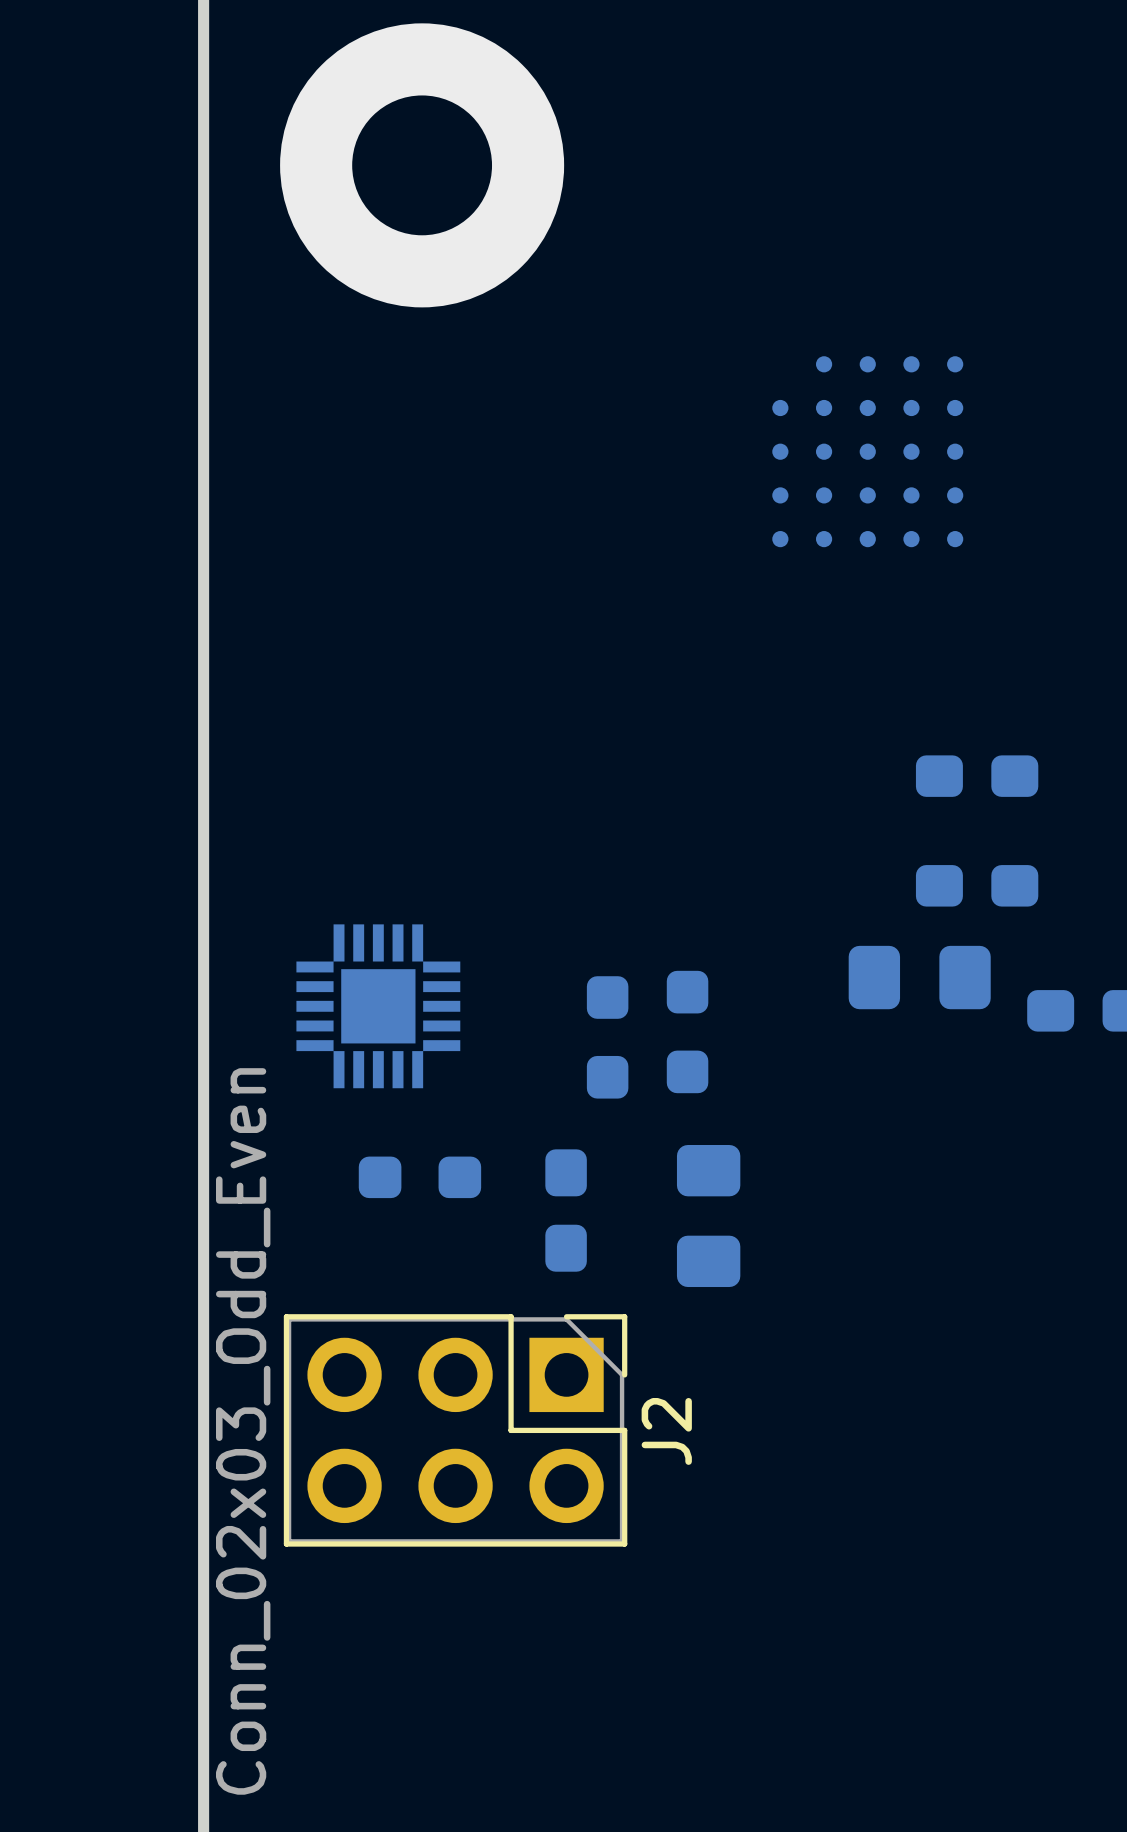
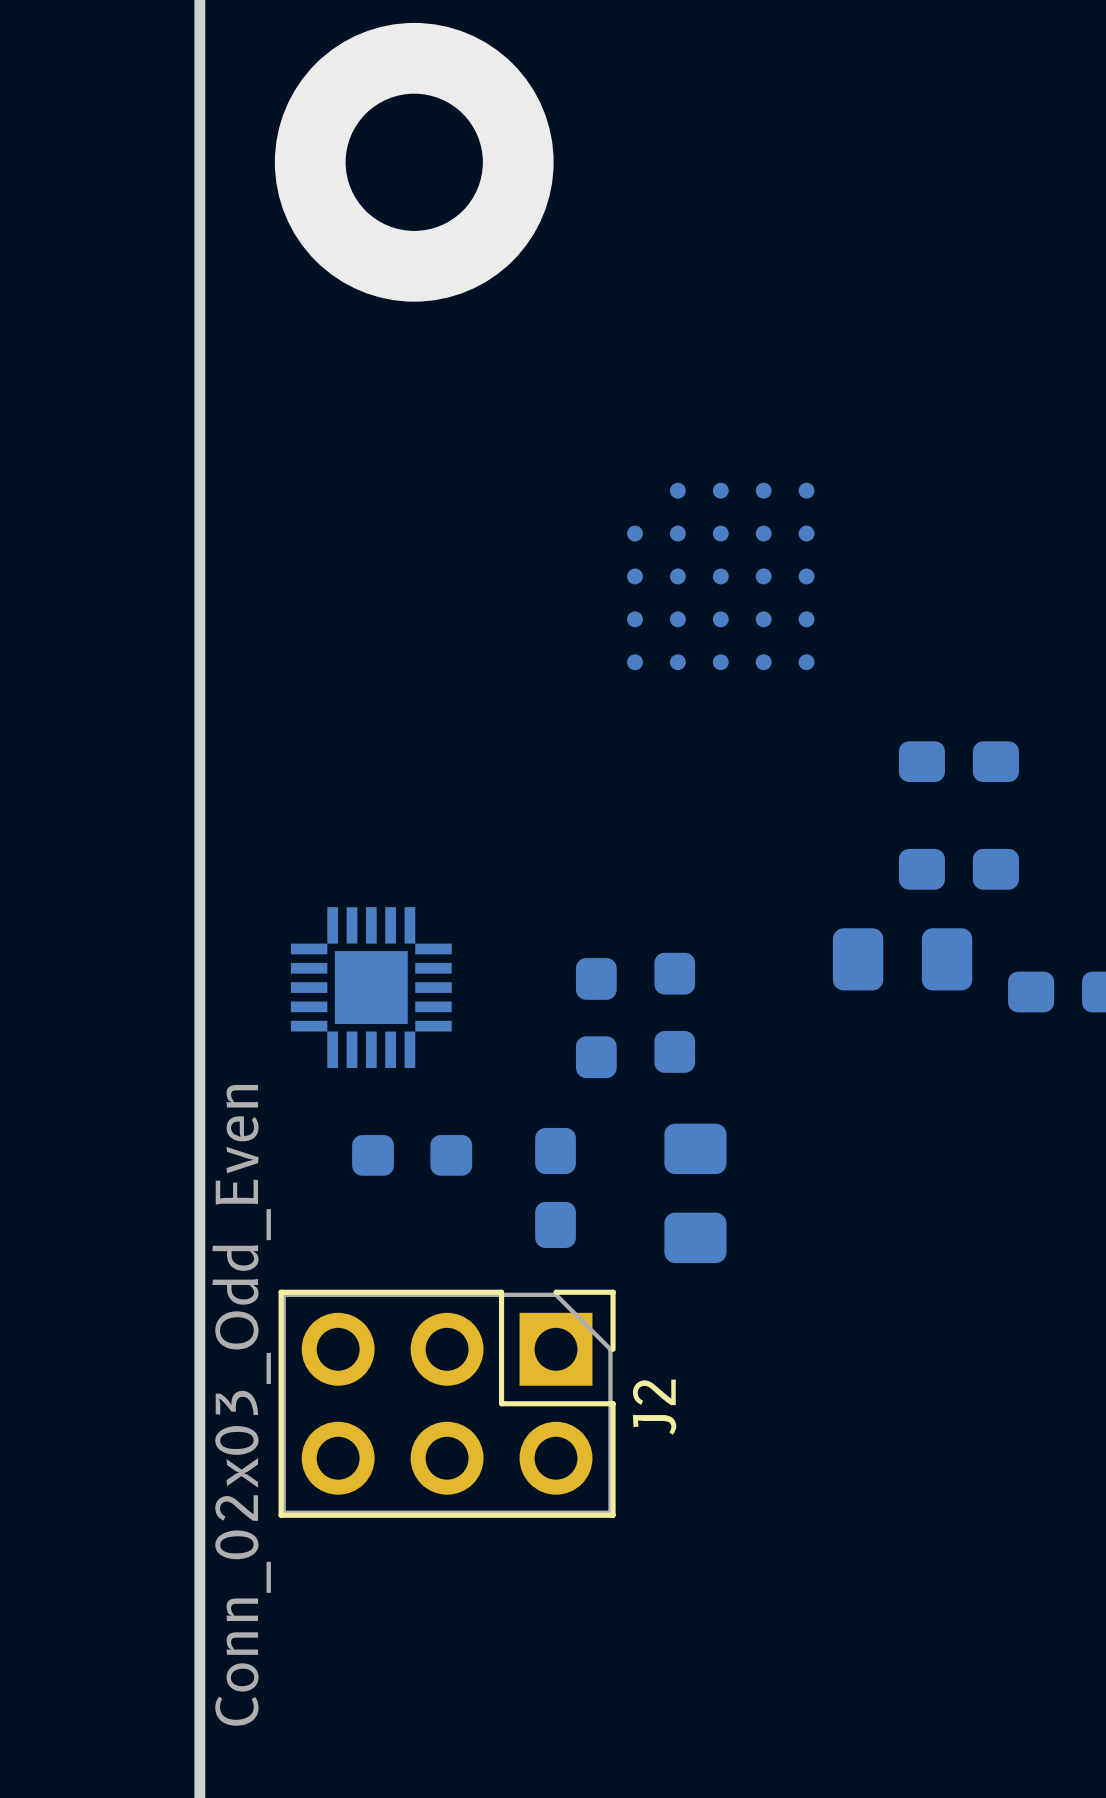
part position: (867, 451) -> (720, 576)

